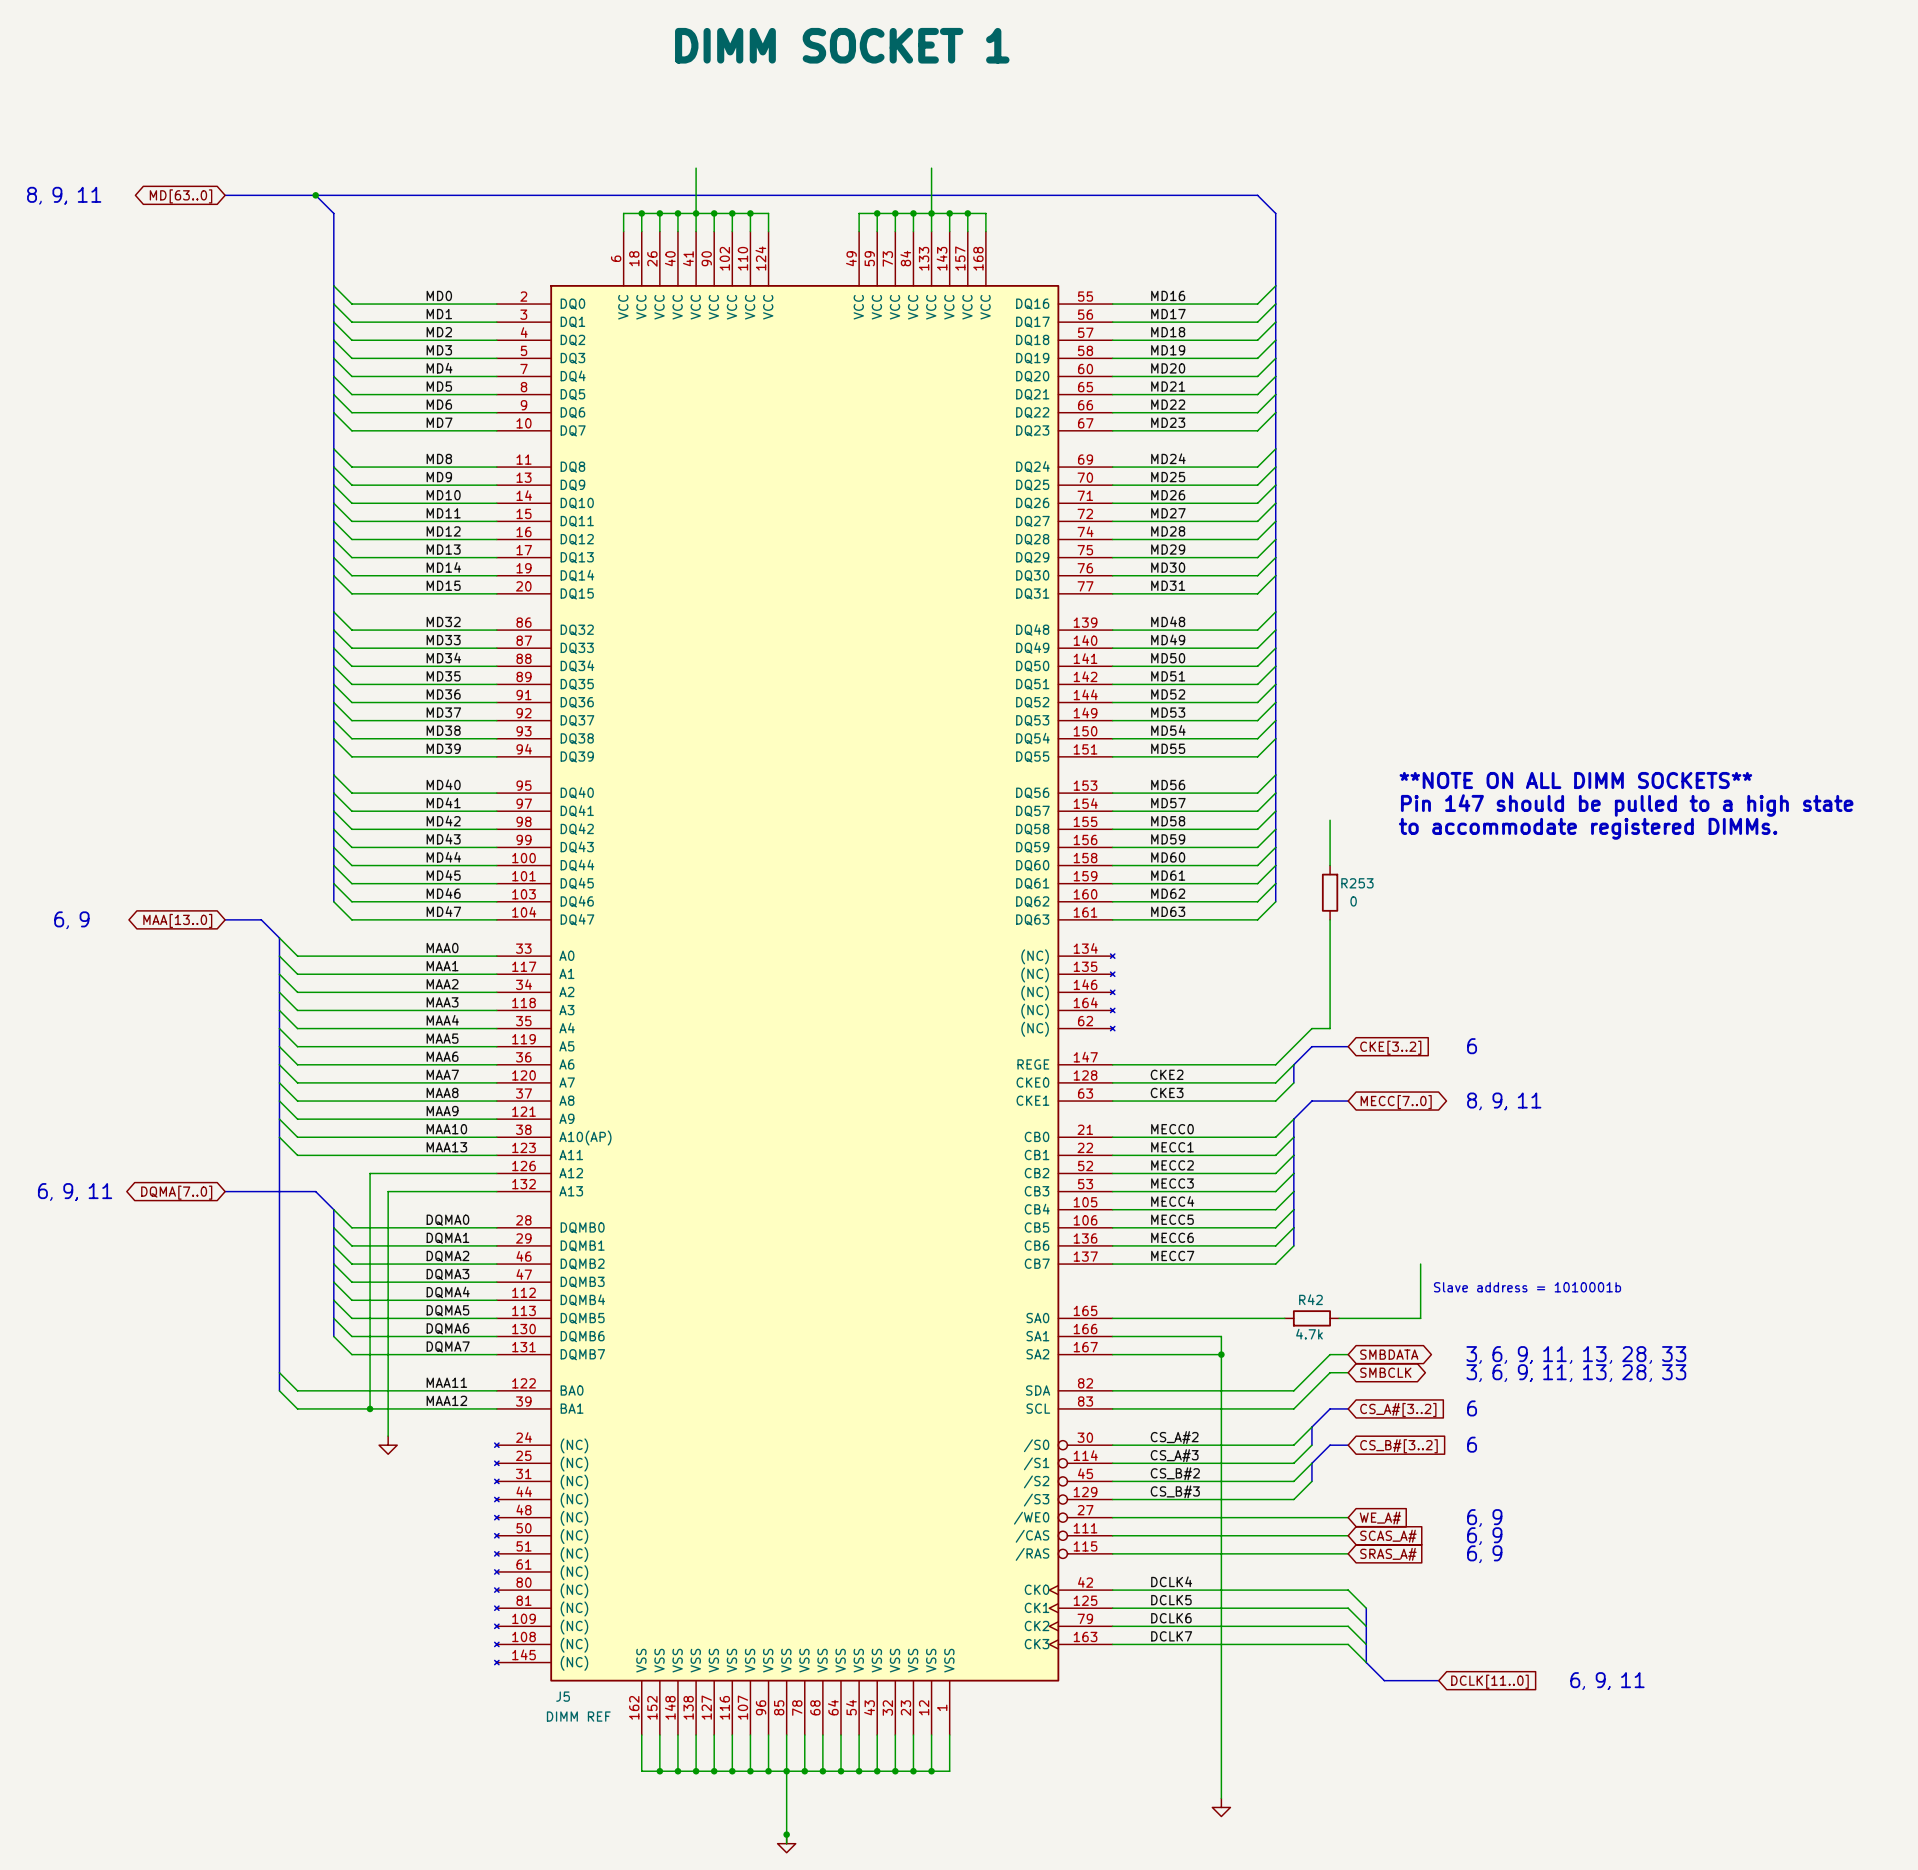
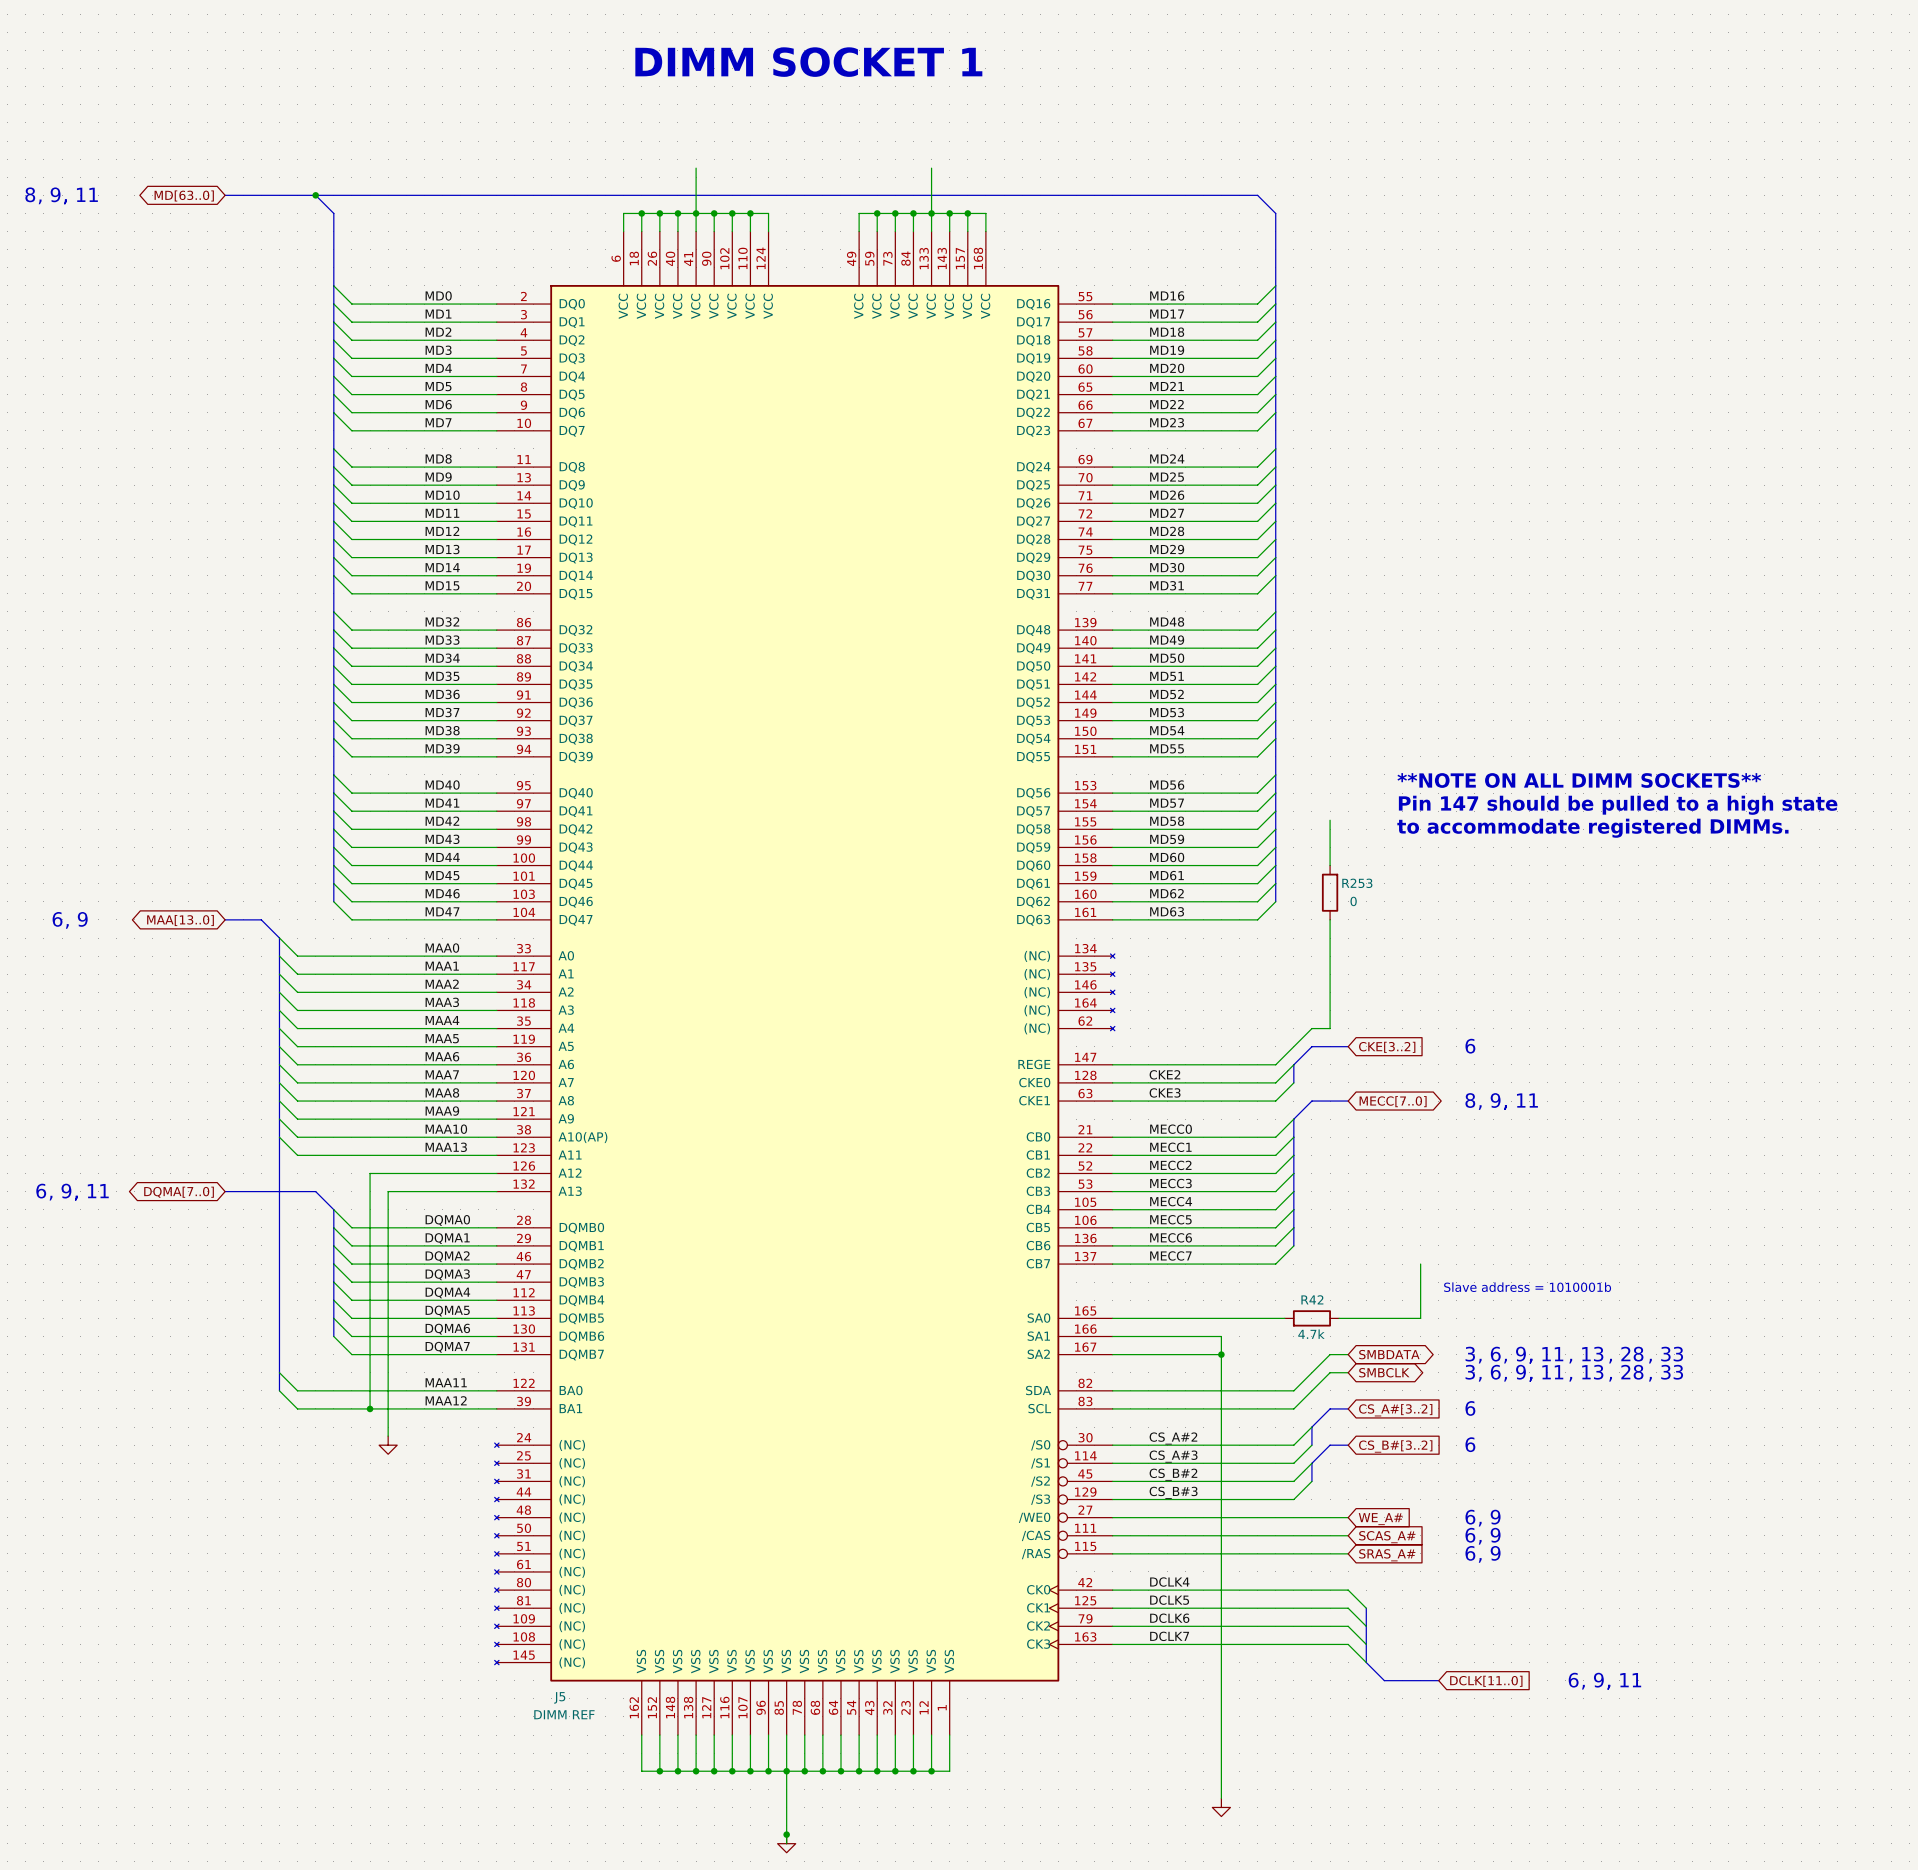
J5 value: DIMM SOCKET 1 (842, 45) -> DIMM REF (564, 1714)
text: none -> DIMM SOCKET 1 (808, 62)
J5 text: DIMM REF (578, 1716) -> none

